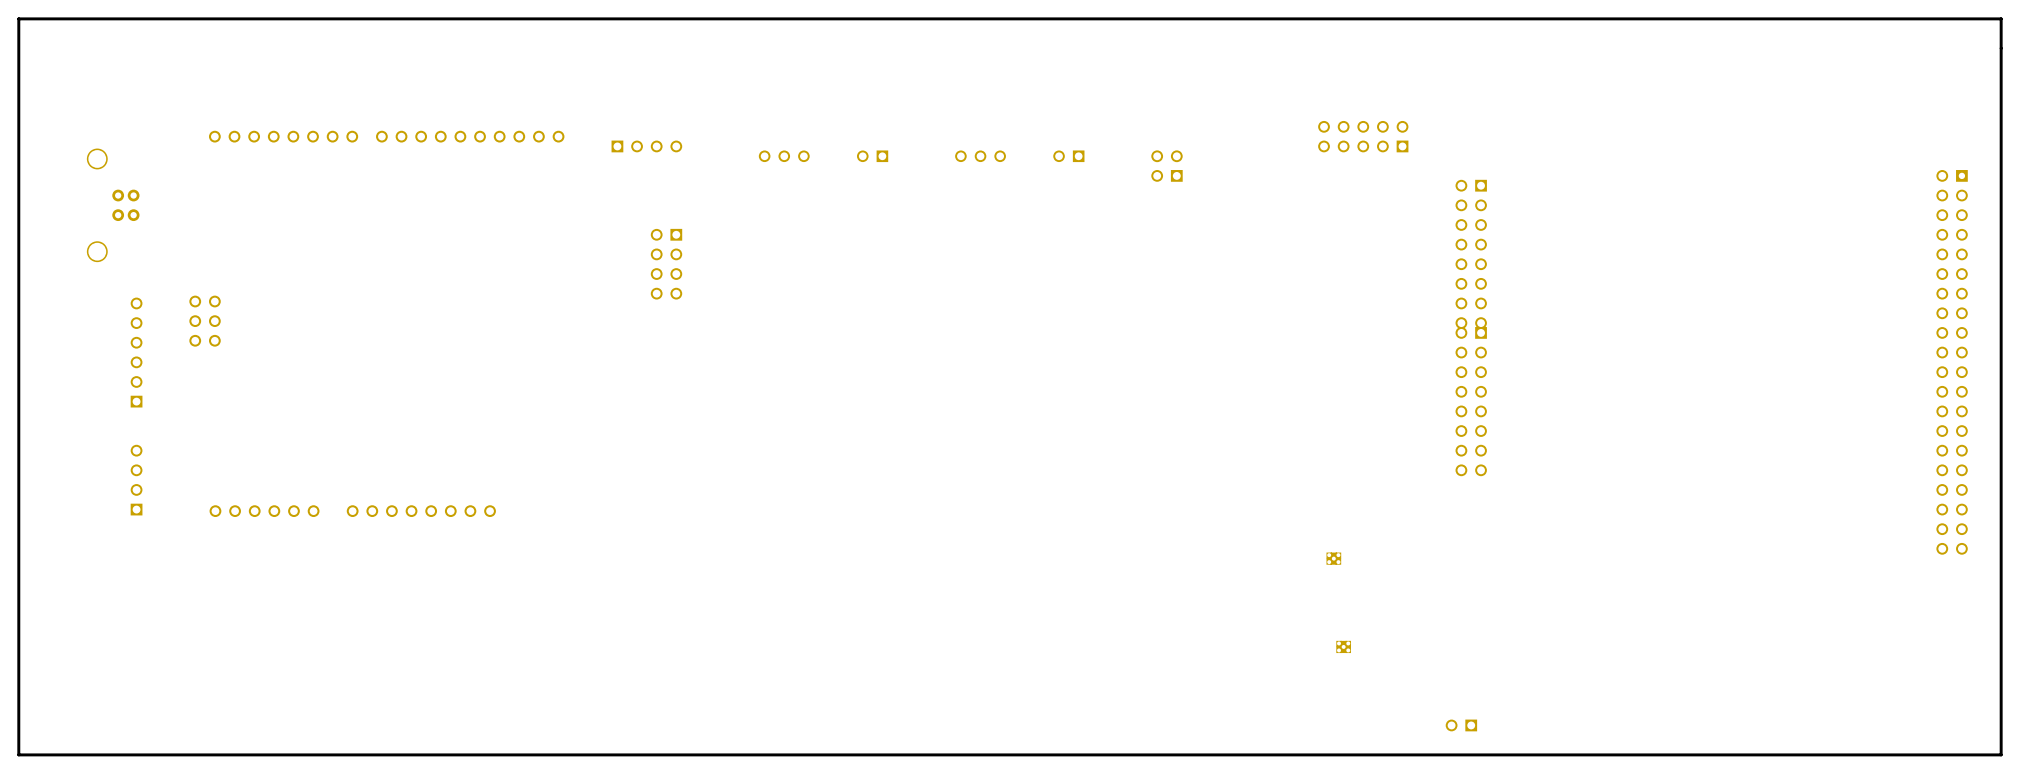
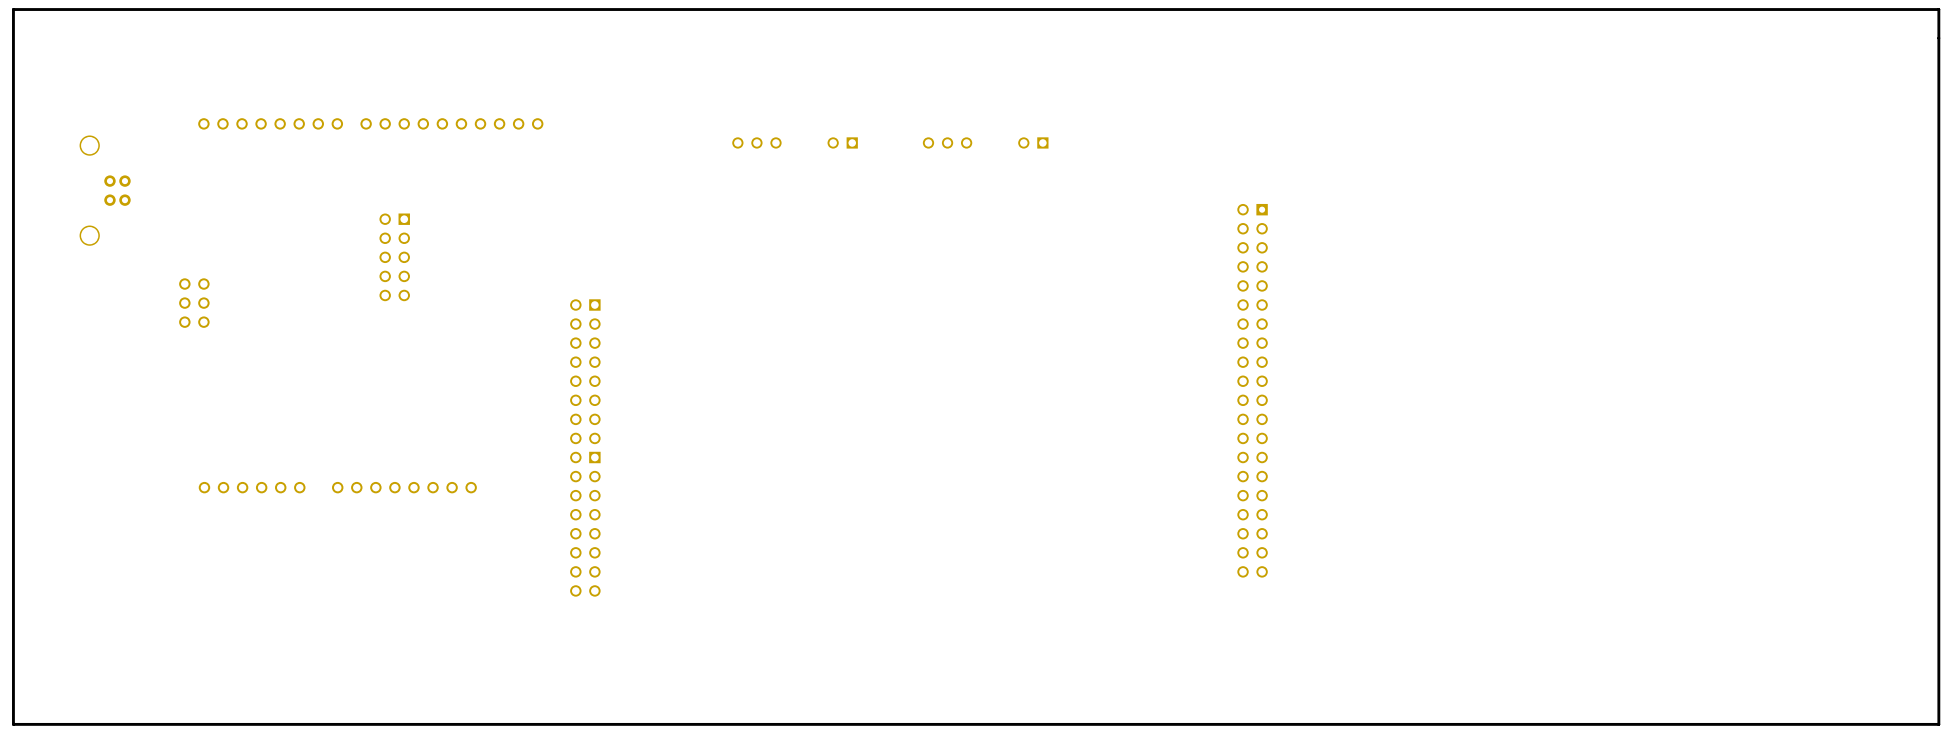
part: (1363, 136) -> none
part: (646, 146) -> none
part: (1167, 166) -> none
part: (1471, 254) -> none
part: (666, 264) -> none
part: none -> (394, 257)
part: (136, 352) -> none
part: (1952, 362) -> none
part: none -> (585, 371)
part: (1471, 401) -> none
part: none -> (1252, 390)
part: (136, 480) -> none
part: none -> (585, 524)
part: (1333, 558) -> none
part: (1343, 646) -> none
part: (1461, 725) -> none

